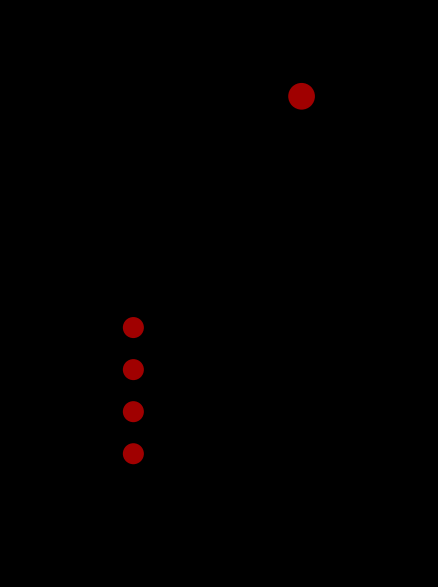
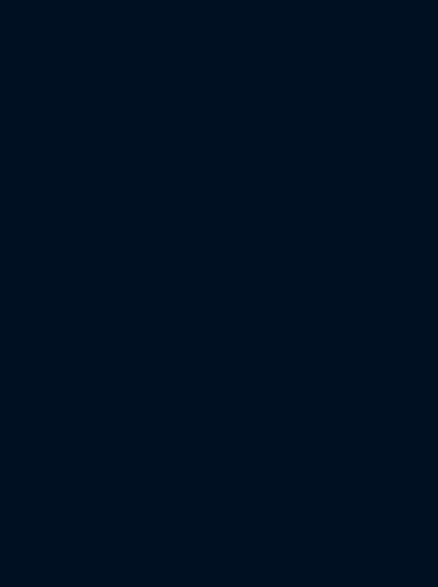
part: (301, 96) -> none
part: (133, 327) -> none
part: (133, 369) -> none
part: (133, 411) -> none
part: (133, 453) -> none

